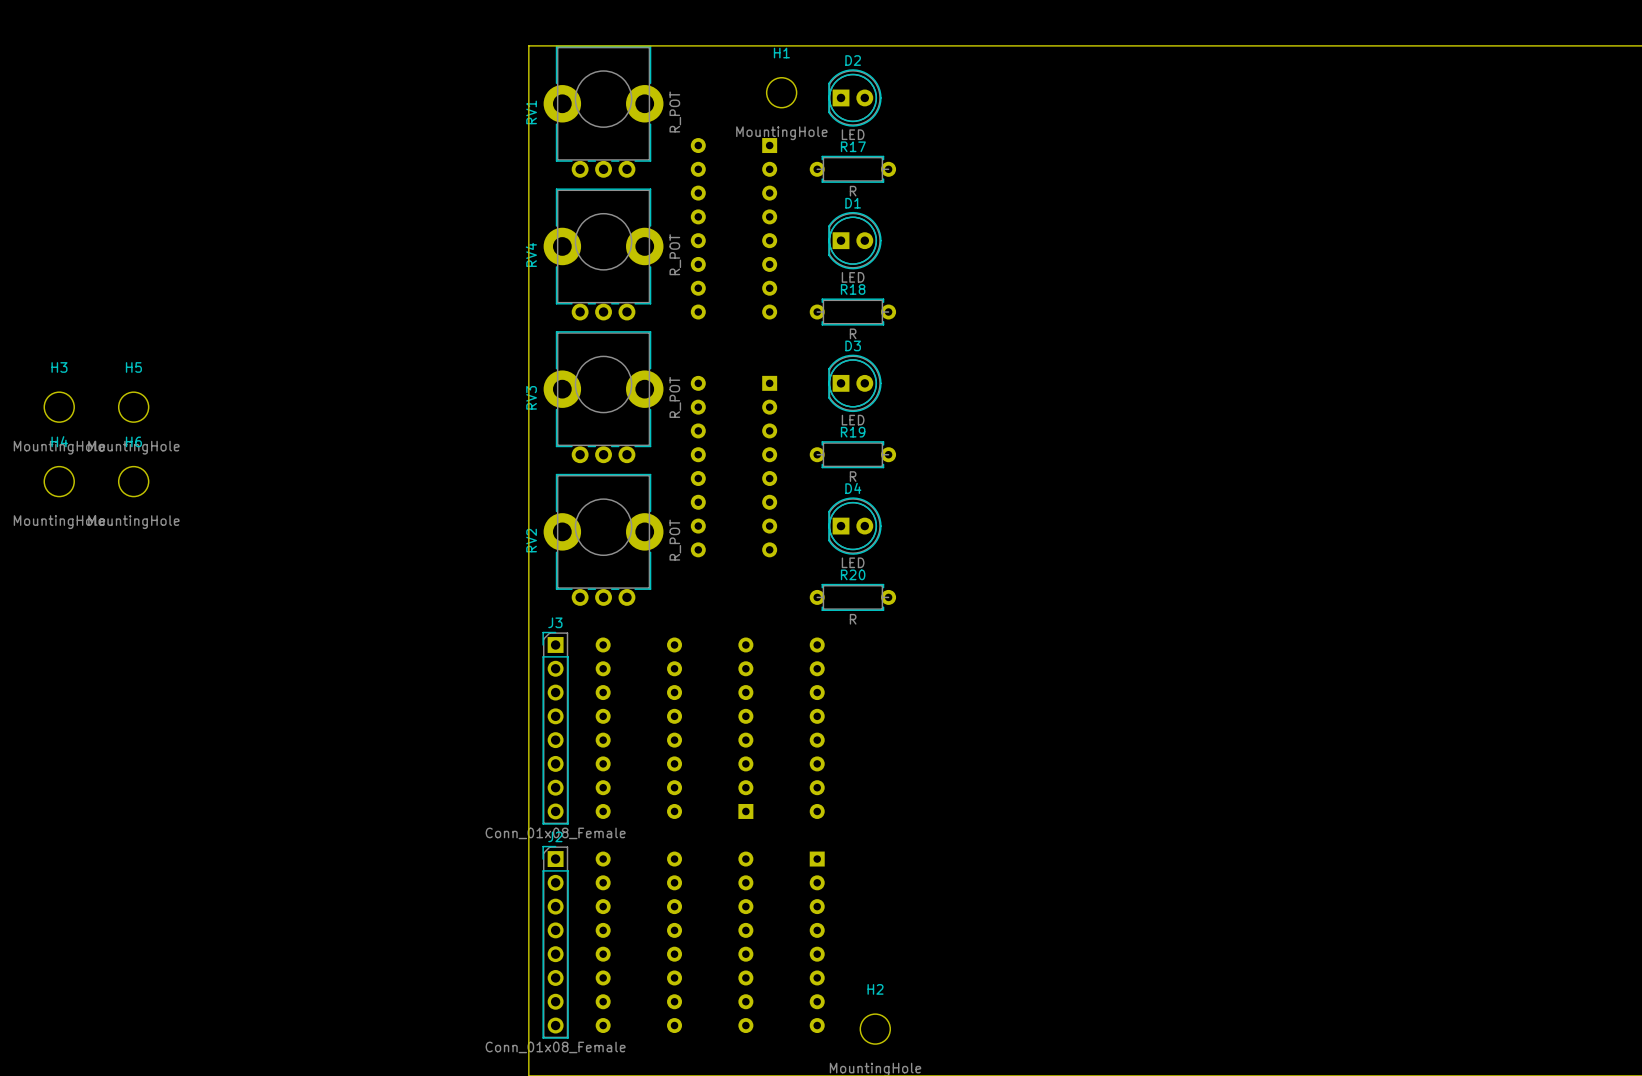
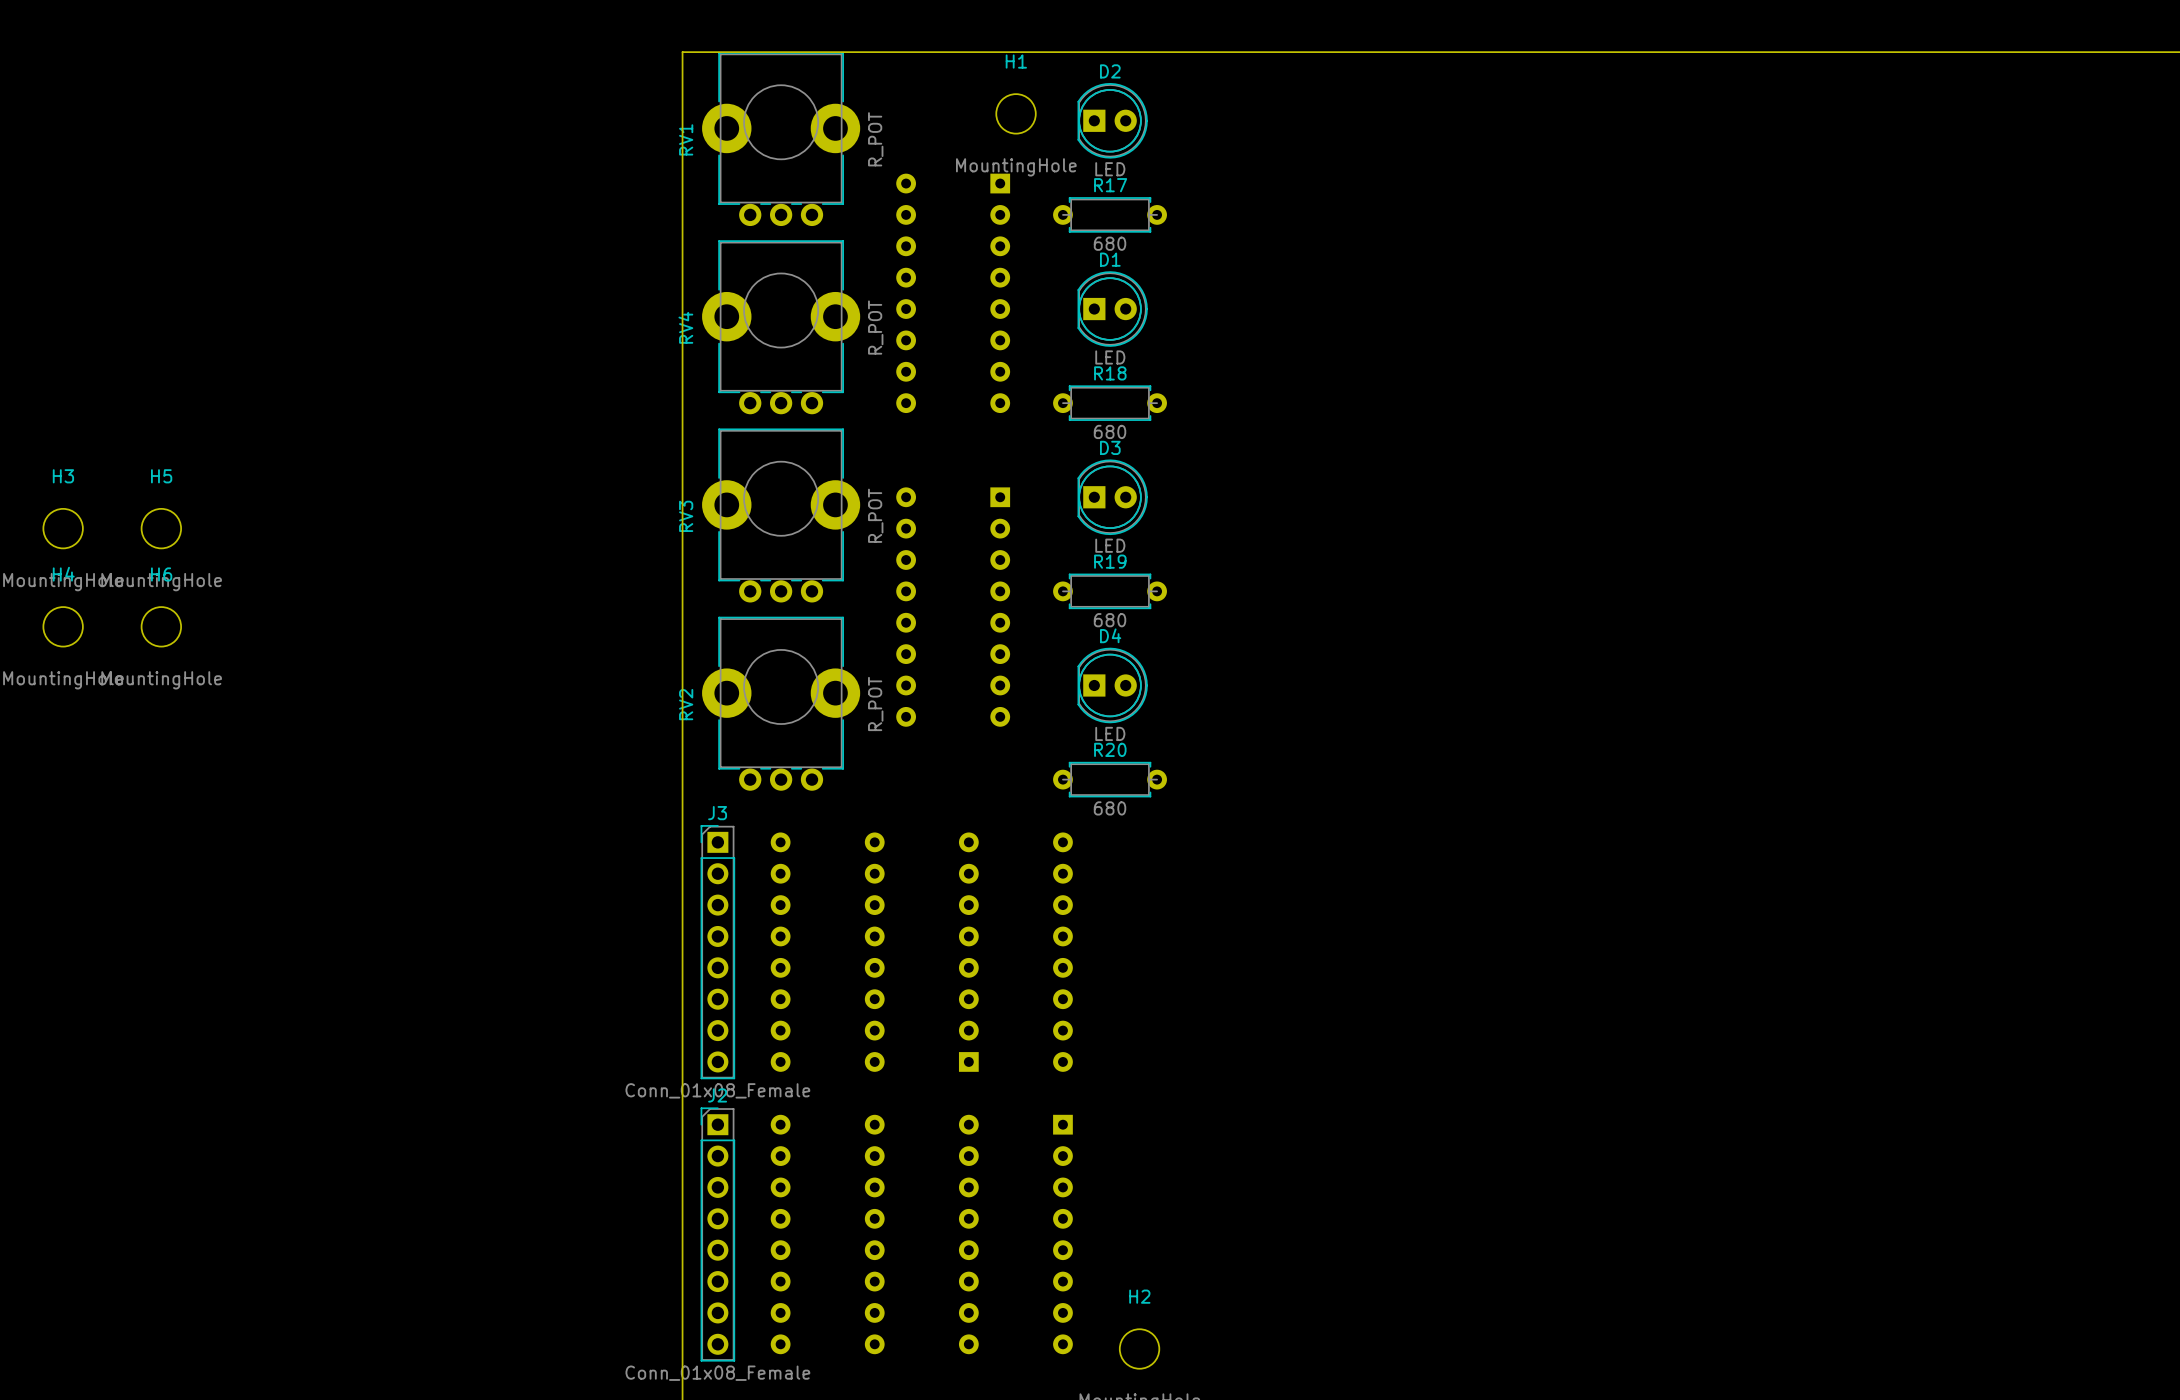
R17 value: R (853, 191) -> 680 (1110, 243)
R18 value: R (853, 333) -> 680 (1110, 431)
R19 value: R (853, 476) -> 680 (1110, 620)
R20 value: R (853, 619) -> 680 (1110, 808)

